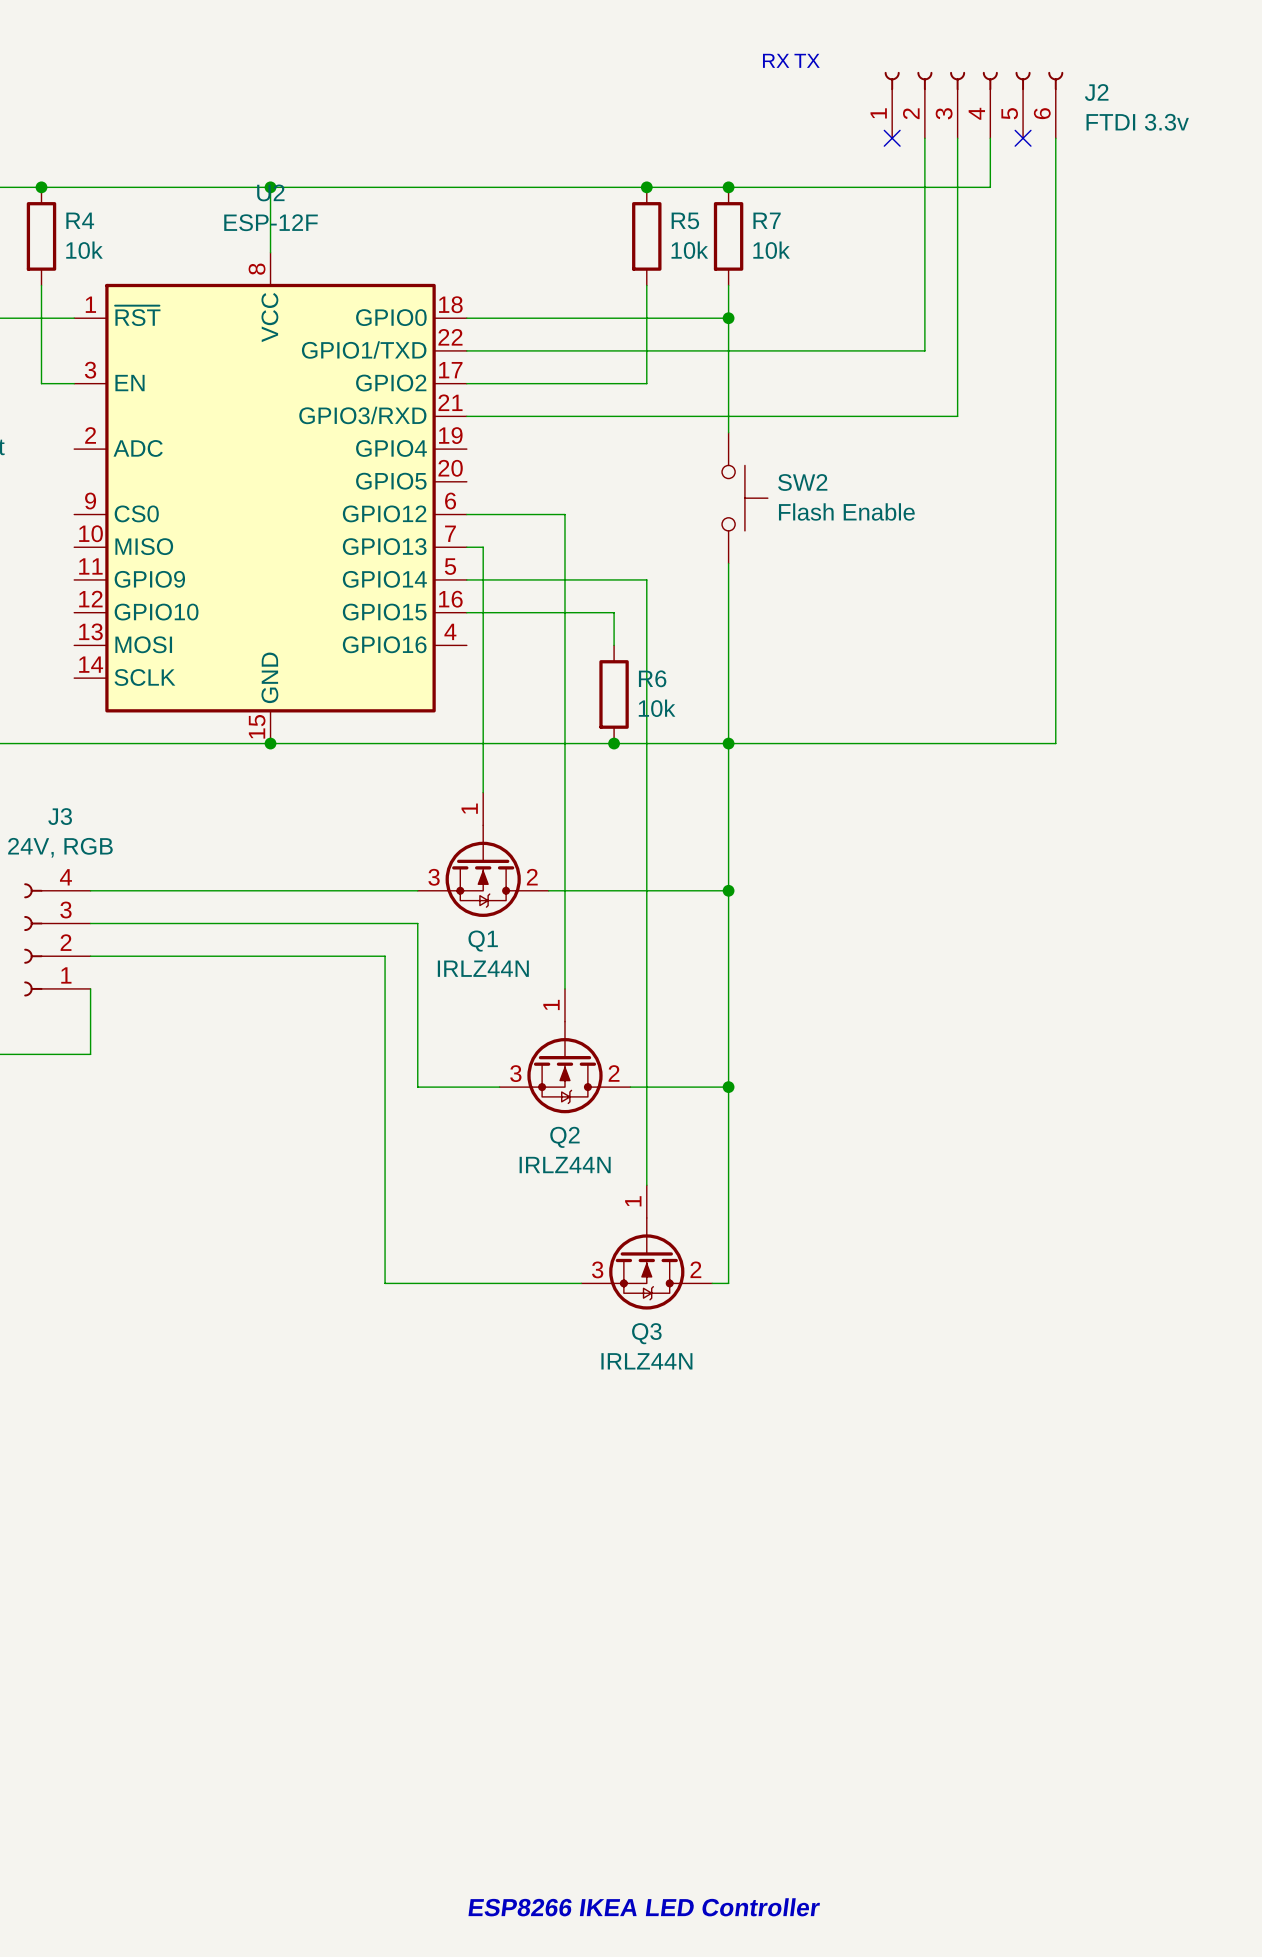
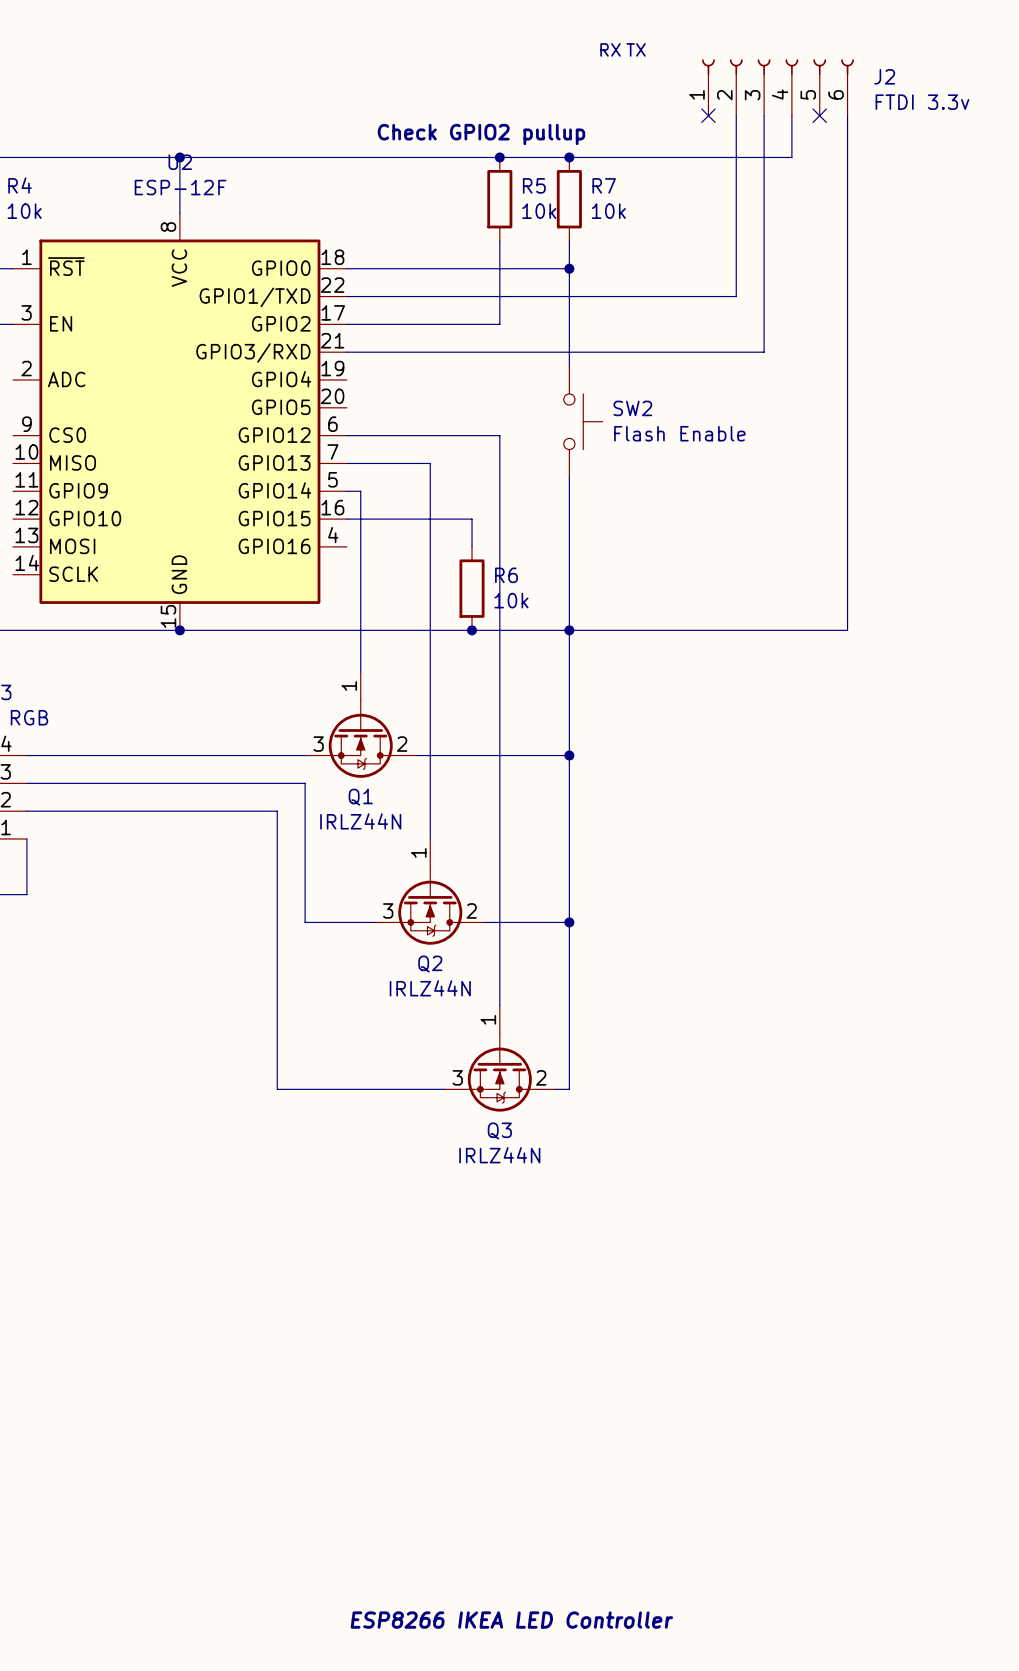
text: none -> Check GPIO2 pullup (481, 134)
wire: (564, 514) (564, 547) -> (430, 435) (499, 435) (499, 491)
wire: (483, 547) (483, 579) (646, 579) -> (360, 463) (430, 463)

